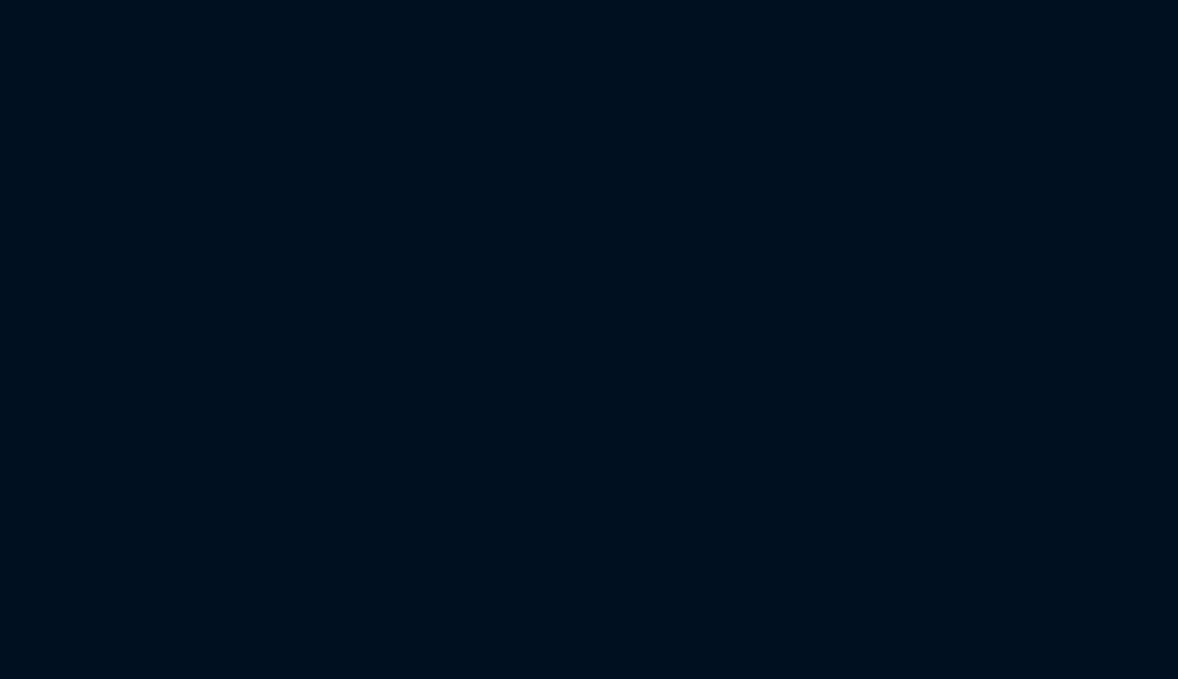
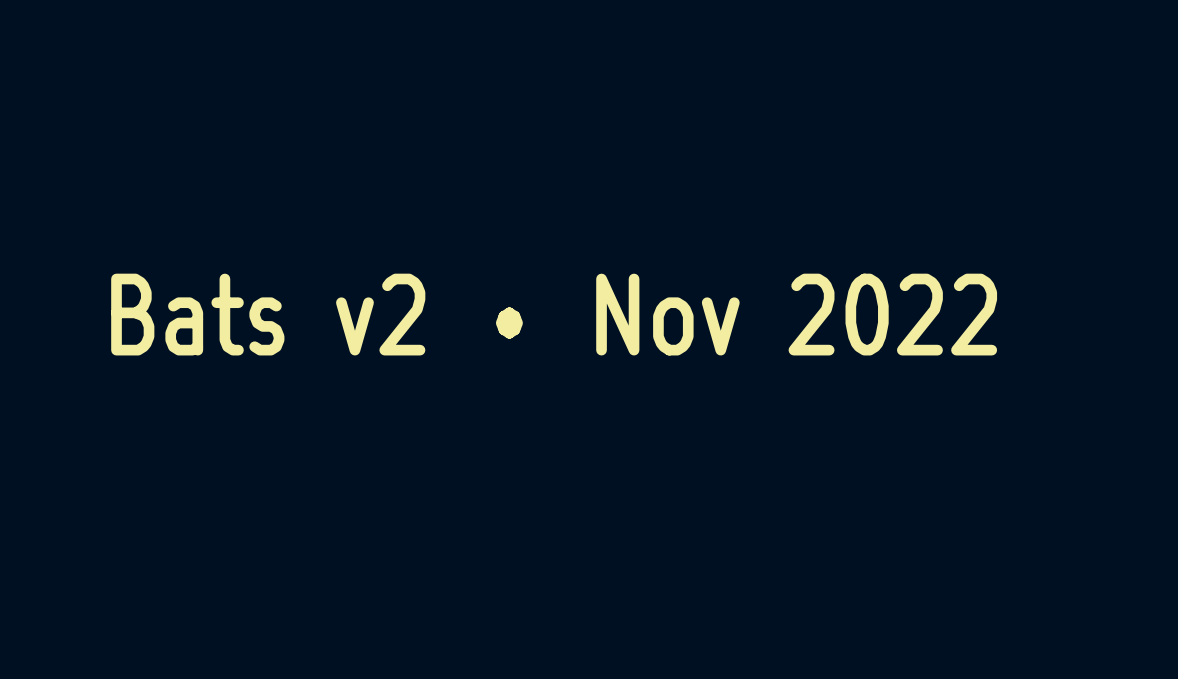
text: none -> Bats v2 • Nov 2022 (554, 314)

